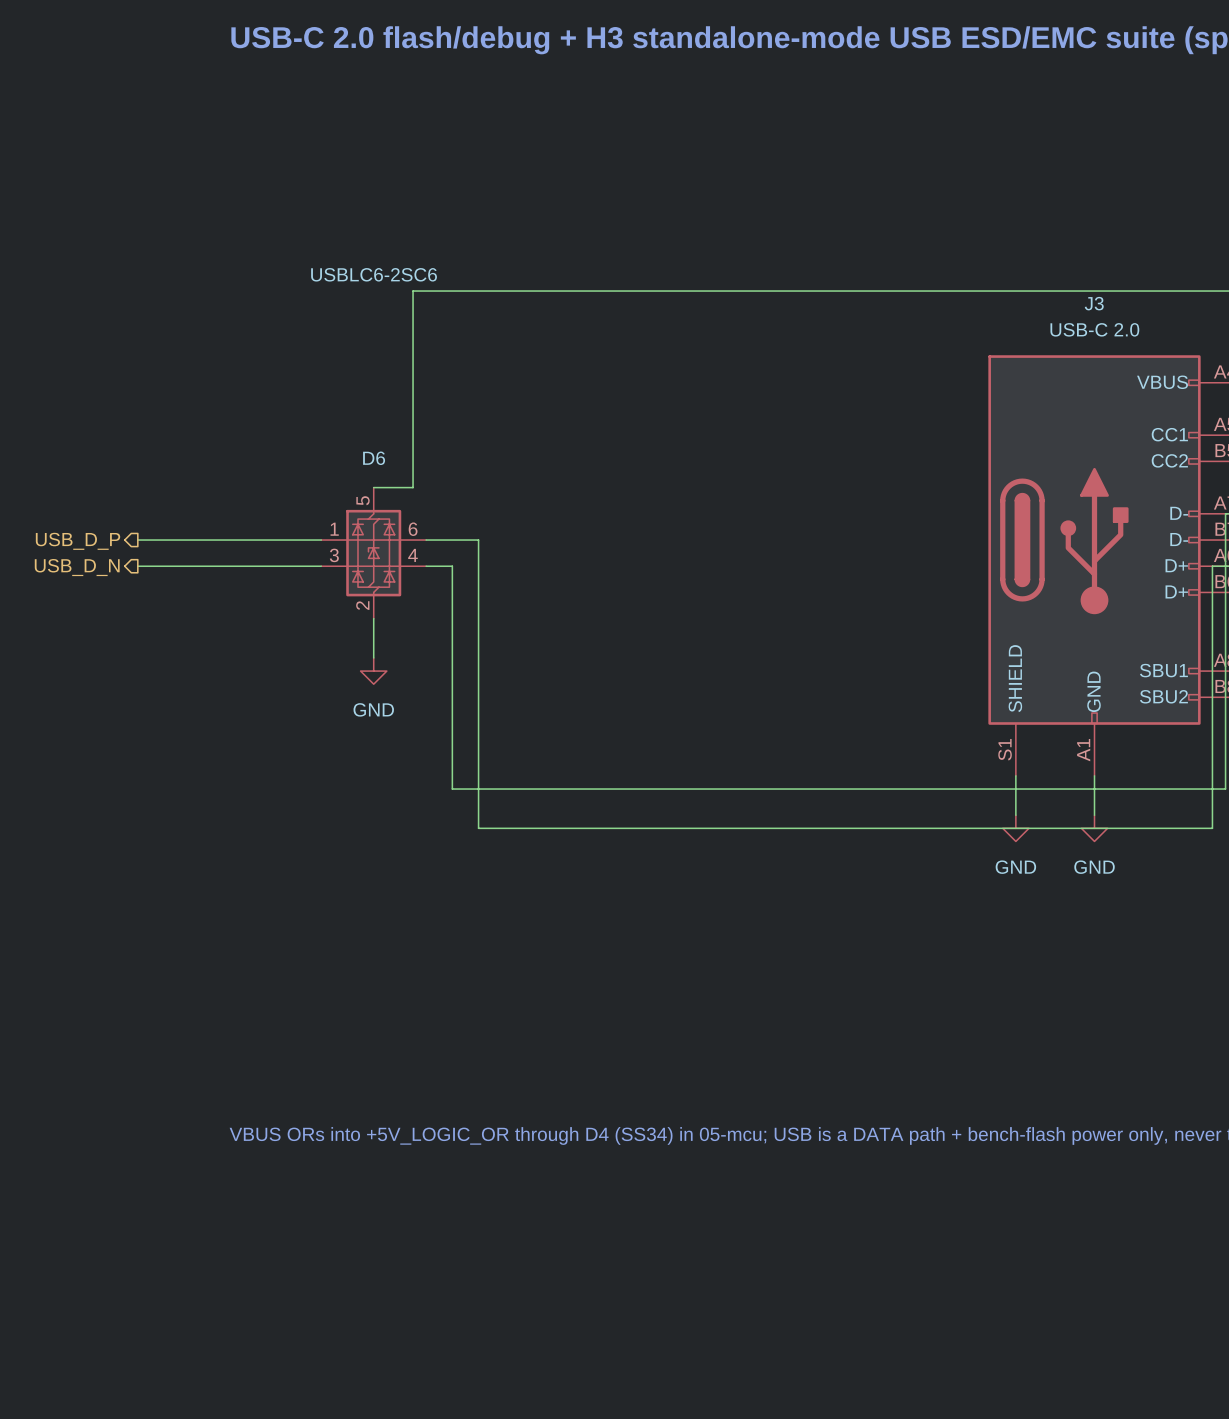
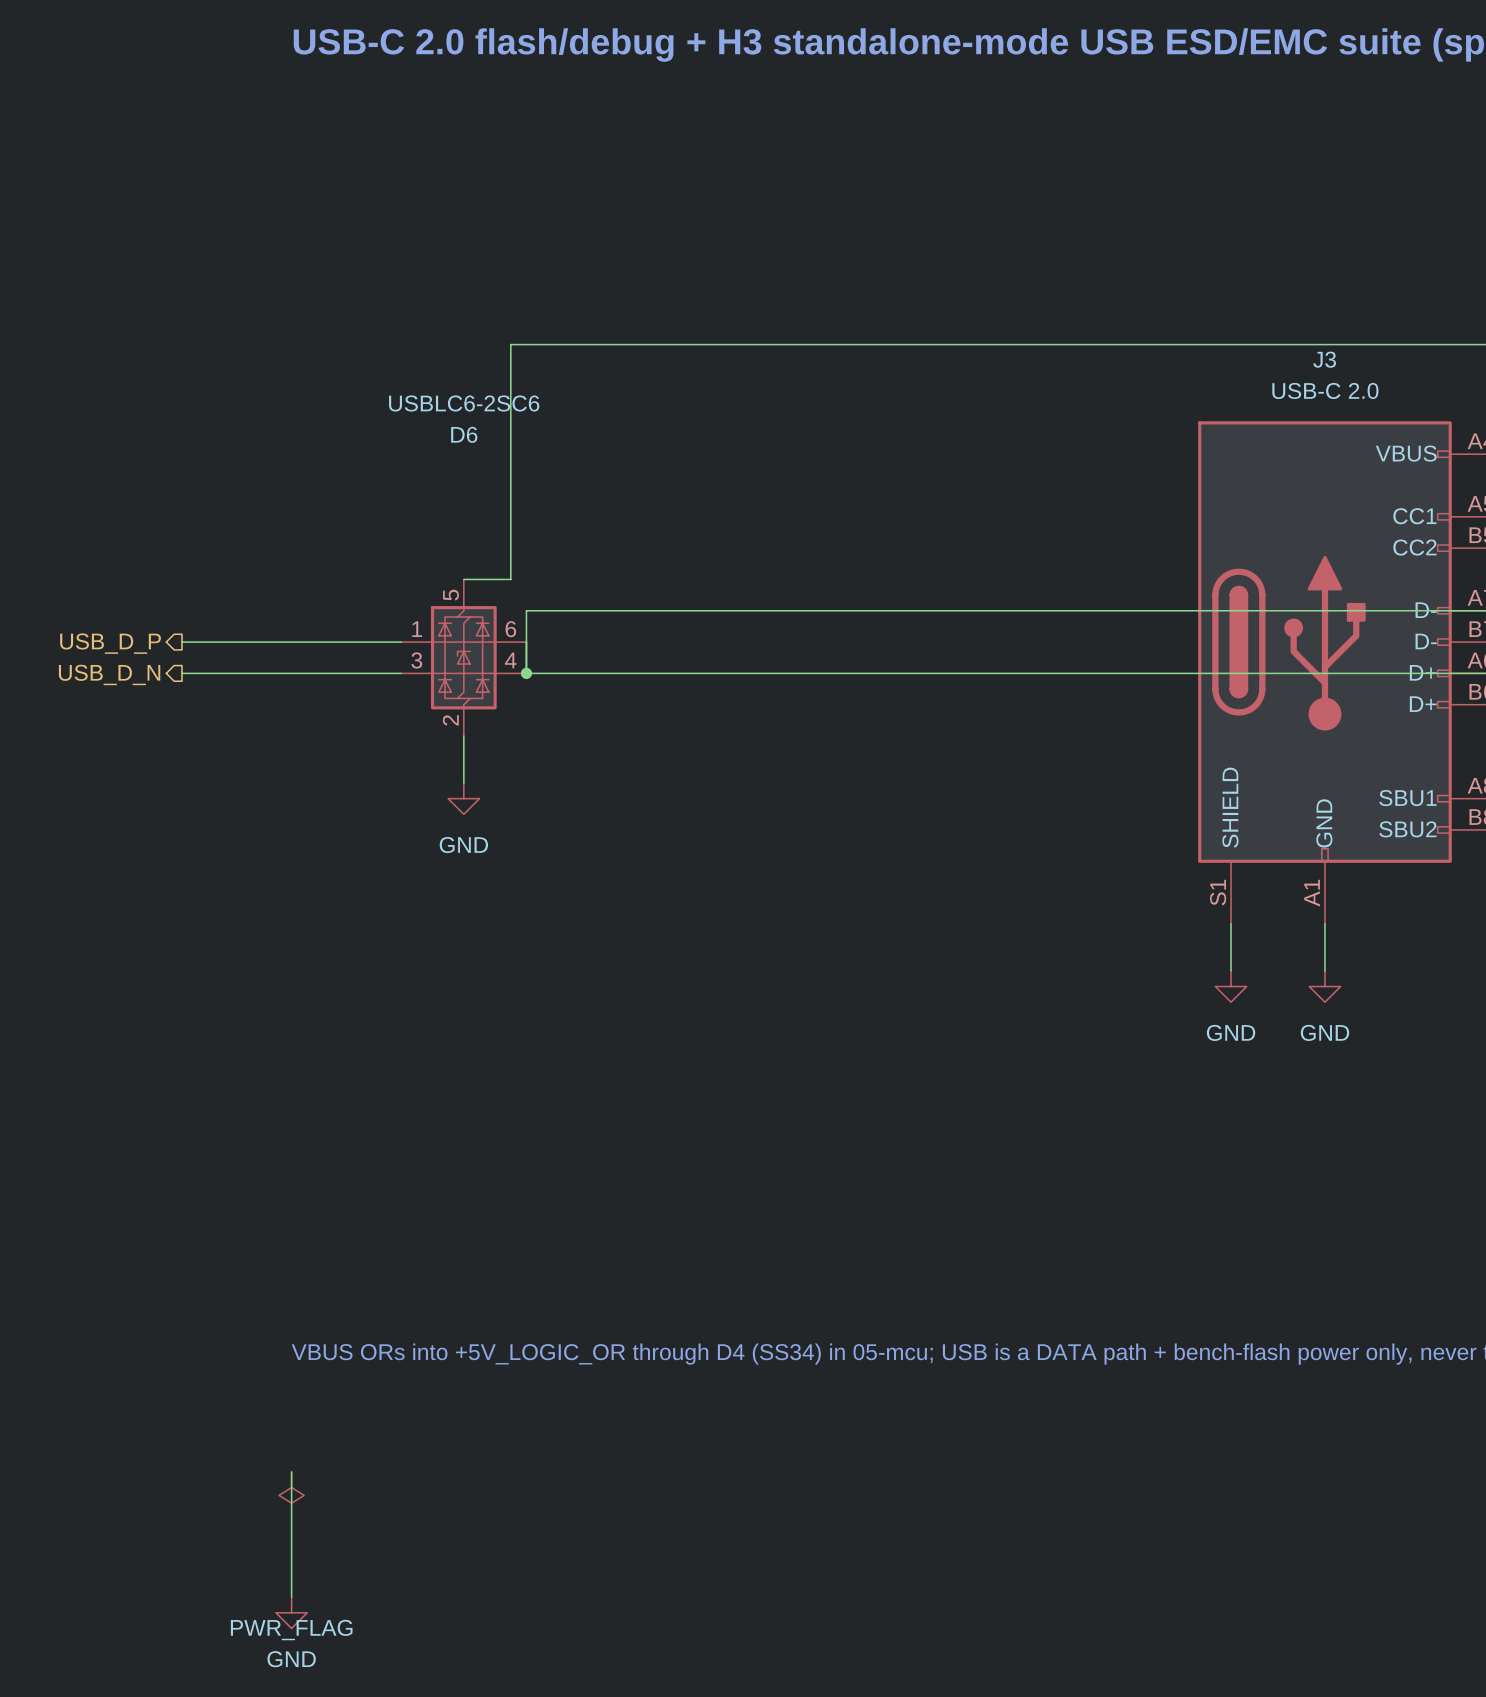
D6 value position: USBLC6-2SC6 (374, 274) -> USBLC6-2SC6 (464, 403)
D6 name position: D6 (374, 458) -> D6 (464, 434)
wire: (1225, 513) (1225, 789) (452, 789) (452, 566) -> (1481, 610) (526, 610) (526, 673)
wire: (426, 540) (478, 540) (478, 828) (1212, 828) (1212, 566) -> (557, 673) (1465, 673)
junction: none -> (526, 673)
wire: none -> (291, 1471) (291, 1597)
power symbol: none -> PWR_FLAG (291, 1487)
power symbol: none -> GND (291, 1612)

